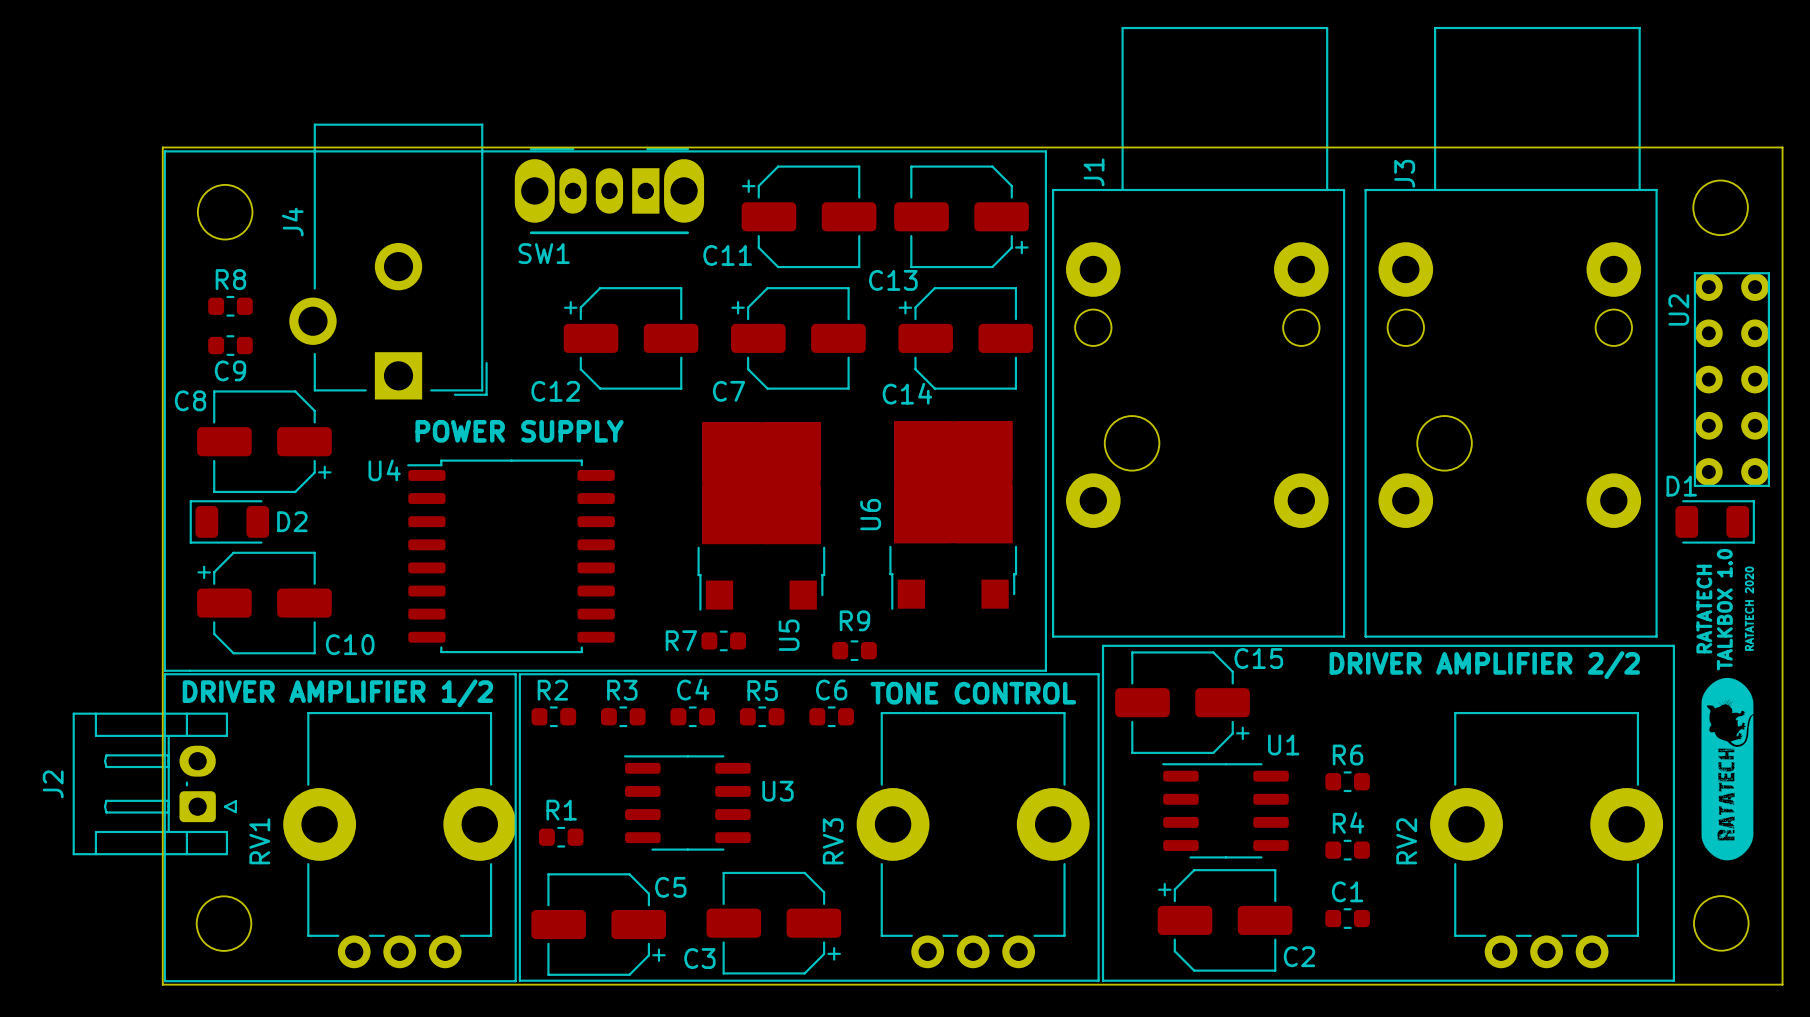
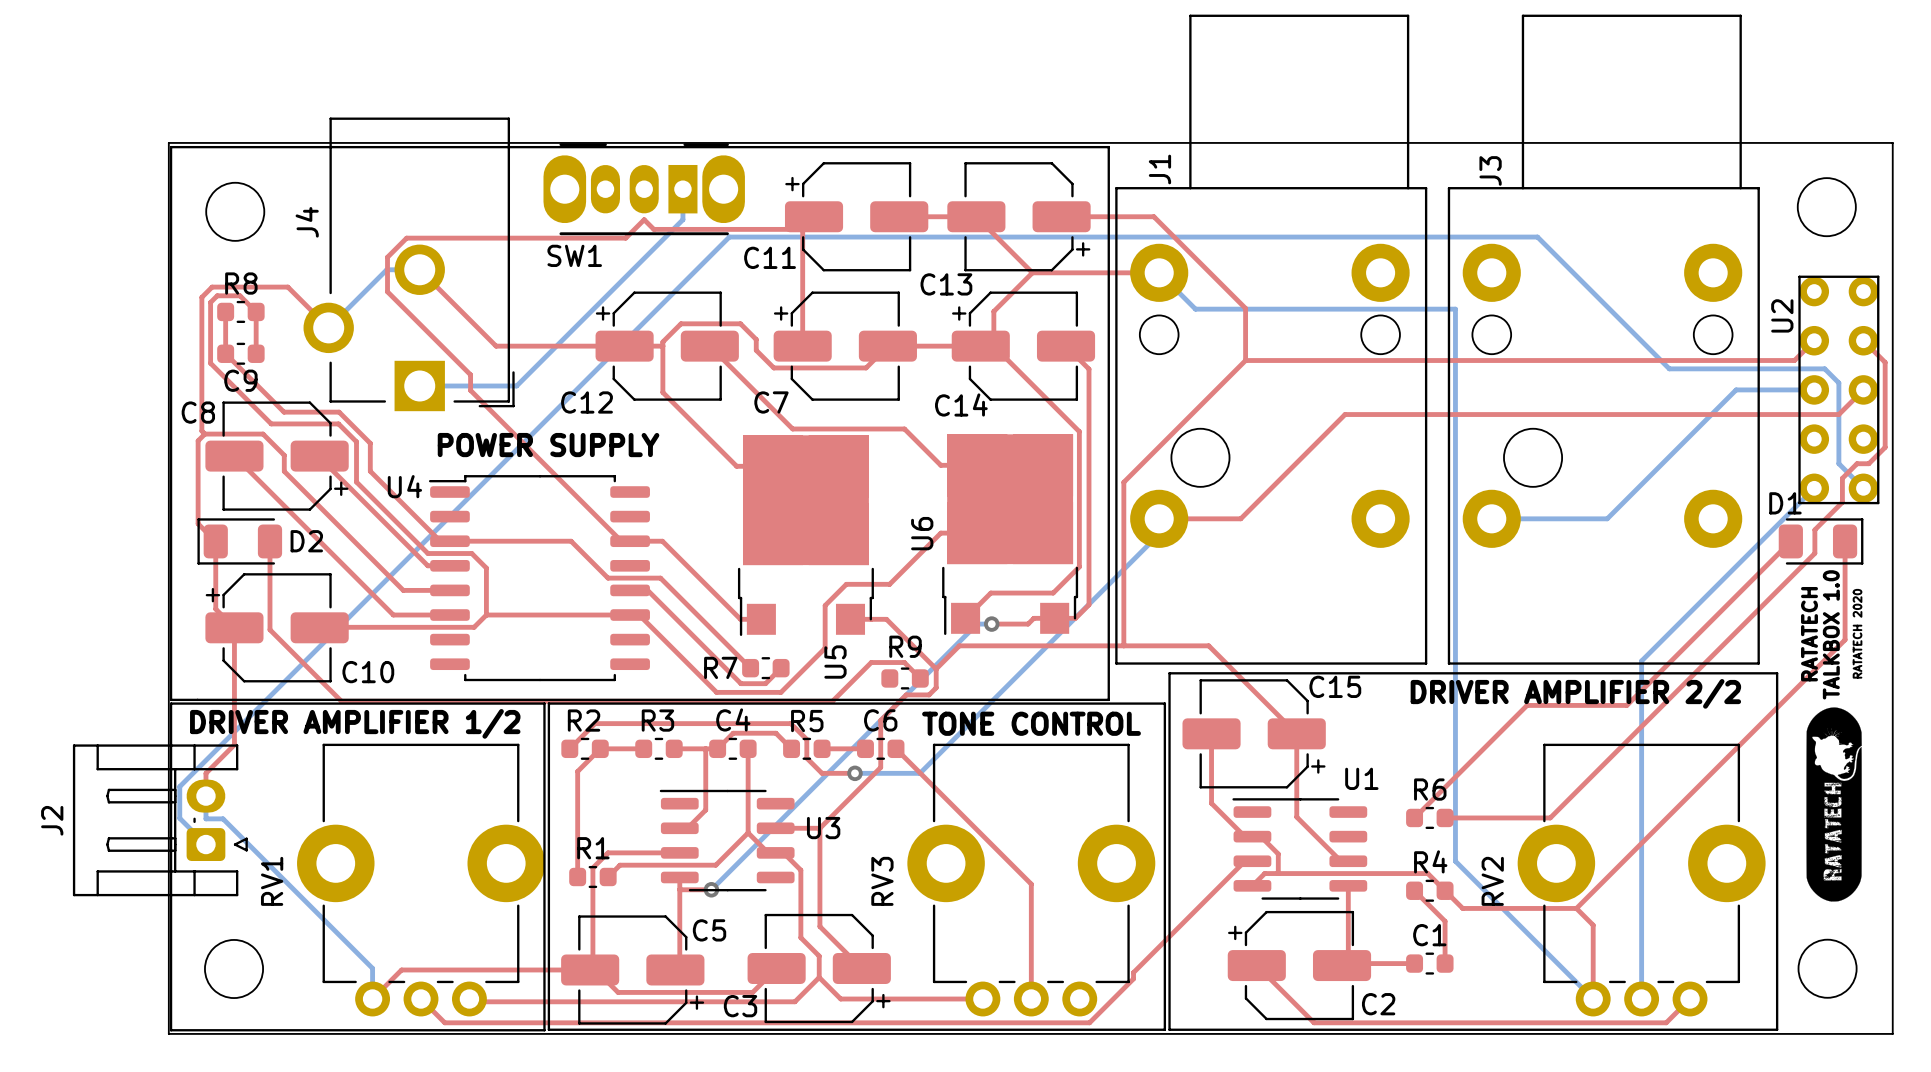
bottom track: none -> (682, 189) (682, 219) (516, 385) (419, 385)
top track: none -> (899, 216) (976, 216) (1032, 272)
top track: none -> (1061, 216) (1153, 216) (1245, 308) (1245, 360)
top track: none -> (801, 229) (653, 229) (644, 219) (625, 238) (406, 238) (387, 257) (387, 291) (470, 374) (470, 390) (621, 541) (662, 541) (740, 619) (761, 619)
top track: none -> (801, 229) (802, 346)
top track: none -> (419, 269) (496, 346) (662, 346)
bottom track: none -> (419, 269) (386, 269) (328, 327)
top track: none -> (1032, 272) (993, 311) (993, 346)
top track: none -> (1032, 272) (1159, 272)
bottom track: none -> (1159, 272) (1195, 309) (1455, 309) (1455, 861) (1593, 999)
top track: none -> (225, 311) (225, 353) (284, 412) (339, 412) (370, 443) (370, 471) (440, 541) (571, 541) (608, 578) (660, 578) (750, 668)
top track: none -> (328, 327) (287, 287) (212, 287) (201, 297) (201, 431) (204, 434)
top track: none -> (1814, 340) (1794, 360) (1245, 360)
top track: none -> (1863, 340) (1885, 362) (1885, 447) (1868, 463) (1857, 463) (1842, 478) (1842, 502) (1814, 529) (1814, 553) (1550, 817) (1445, 817)
top track: none -> (709, 346) (792, 428) (904, 428) (940, 465) (1013, 465)
top track: none -> (993, 346) (887, 346) (866, 367) (773, 367) (756, 350) (756, 339) (740, 323) (681, 323) (662, 341) (662, 392) (736, 466) (809, 466)
top track: none -> (993, 346) (1079, 431) (1079, 566) (1053, 593) (990, 593) (965, 618)
top track: none -> (1066, 346) (1089, 369) (1089, 604) (1075, 618) (1033, 618) (1028, 624) (991, 624)
top track: none -> (256, 353) (256, 311) (240, 295) (217, 295) (210, 302) (210, 363) (271, 423) (338, 423) (356, 441) (356, 482) (427, 553) (471, 553) (486, 568) (486, 615)
top track: none -> (1245, 360) (1123, 482) (1123, 645)
bottom track: none -> (1814, 389) (1736, 389) (1607, 518) (1491, 518)
top track: none -> (1863, 389) (1838, 414) (1345, 414) (1240, 518) (1159, 518)
top track: none -> (204, 434) (198, 440) (198, 523) (215, 541) (215, 609) (234, 627) (234, 744) (205, 773) (205, 796)
top track: none -> (204, 434) (263, 434) (284, 455) (284, 471) (403, 590) (449, 590)
top track: none -> (234, 456) (393, 615) (449, 615)
top track: none -> (319, 456) (427, 565) (449, 565)
bottom track: none -> (1814, 488) (1641, 660) (1641, 999)
bottom track: none -> (1863, 488) (1838, 463) (1838, 382) (1824, 368) (1669, 368) (1537, 237) (729, 237) (179, 786) (179, 818) (205, 844)
bottom track: none -> (1159, 518) (1159, 534) (919, 773) (854, 773)
top track: none -> (1006, 532) (940, 533) (889, 584) (846, 584) (825, 605) (825, 648) (780, 692) (716, 692) (639, 615) (486, 615)
top track: none -> (269, 541) (269, 629) (341, 701) (832, 701) (871, 662) (904, 662) (920, 678)
top track: none -> (1790, 541) (1626, 705) (1527, 705) (1414, 817)
top track: none -> (1845, 541) (1845, 639) (1576, 908)
top track: none -> (630, 590) (647, 590) (740, 683) (765, 683) (781, 668)
top track: none -> (486, 615) (474, 627) (319, 627)
top track: none -> (850, 619) (886, 619) (936, 668)
bottom track: none -> (991, 624) (977, 624) (711, 889)
via: none -> (991, 624)
top track: none -> (936, 668) (959, 645) (1208, 645) (1296, 733) (1296, 817) (1340, 861) (1348, 861)
top track: none -> (936, 668) (936, 687) (929, 694) (906, 694) (880, 720) (880, 767) (819, 828)
top track: none -> (1211, 733) (1211, 803) (1244, 836) (1260, 836) (1278, 854) (1278, 873)
top track: none -> (569, 748) (595, 723) (790, 723) (806, 739) (806, 758) (822, 773) (854, 773)
top track: none -> (643, 748) (600, 748) (577, 771) (577, 876)
top track: none -> (674, 748) (717, 748) (733, 733) (775, 733) (791, 748)
top track: none -> (705, 748) (705, 810) (687, 828) (679, 828)
top track: none -> (748, 748) (748, 832)
top track: none -> (822, 748) (865, 748)
top track: none -> (895, 748) (1031, 884) (1031, 999)
via: none -> (854, 773)
bottom track: none -> (205, 796) (205, 818) (223, 818) (372, 968) (372, 999)
top track: none -> (775, 828) (819, 828)
top track: none -> (819, 828) (819, 926) (861, 968)
top track: none -> (748, 832) (768, 852) (783, 852) (800, 870) (800, 937) (819, 956) (819, 977)
top track: none -> (748, 832) (715, 865) (619, 865) (608, 876)
top track: none -> (679, 852) (607, 852) (592, 867) (592, 967)
top track: none -> (1252, 861) (1244, 861) (1133, 972) (1133, 978) (1089, 1022) (444, 1022) (421, 999)
top track: none -> (679, 877) (679, 965) (675, 969)
top track: none -> (1252, 885) (1264, 873) (1427, 873) (1462, 908) (1576, 908)
top track: none -> (1348, 885) (1348, 963)
top track: none -> (679, 889) (711, 889)
via: none -> (711, 889)
top track: none -> (1414, 890) (1445, 921) (1445, 963)
top track: none -> (1576, 908) (1593, 925) (1593, 999)
top track: none -> (1414, 963) (1344, 963) (1342, 965)
top track: none -> (1256, 965) (1314, 1022) (1666, 1022) (1690, 999)
top track: none -> (592, 967) (590, 969) (401, 969) (372, 999)
top track: none -> (592, 967) (618, 992) (752, 992) (776, 968)
top track: none -> (819, 977) (840, 999) (982, 999)
top track: none -> (819, 977) (794, 1001) (472, 1001) (469, 999)

